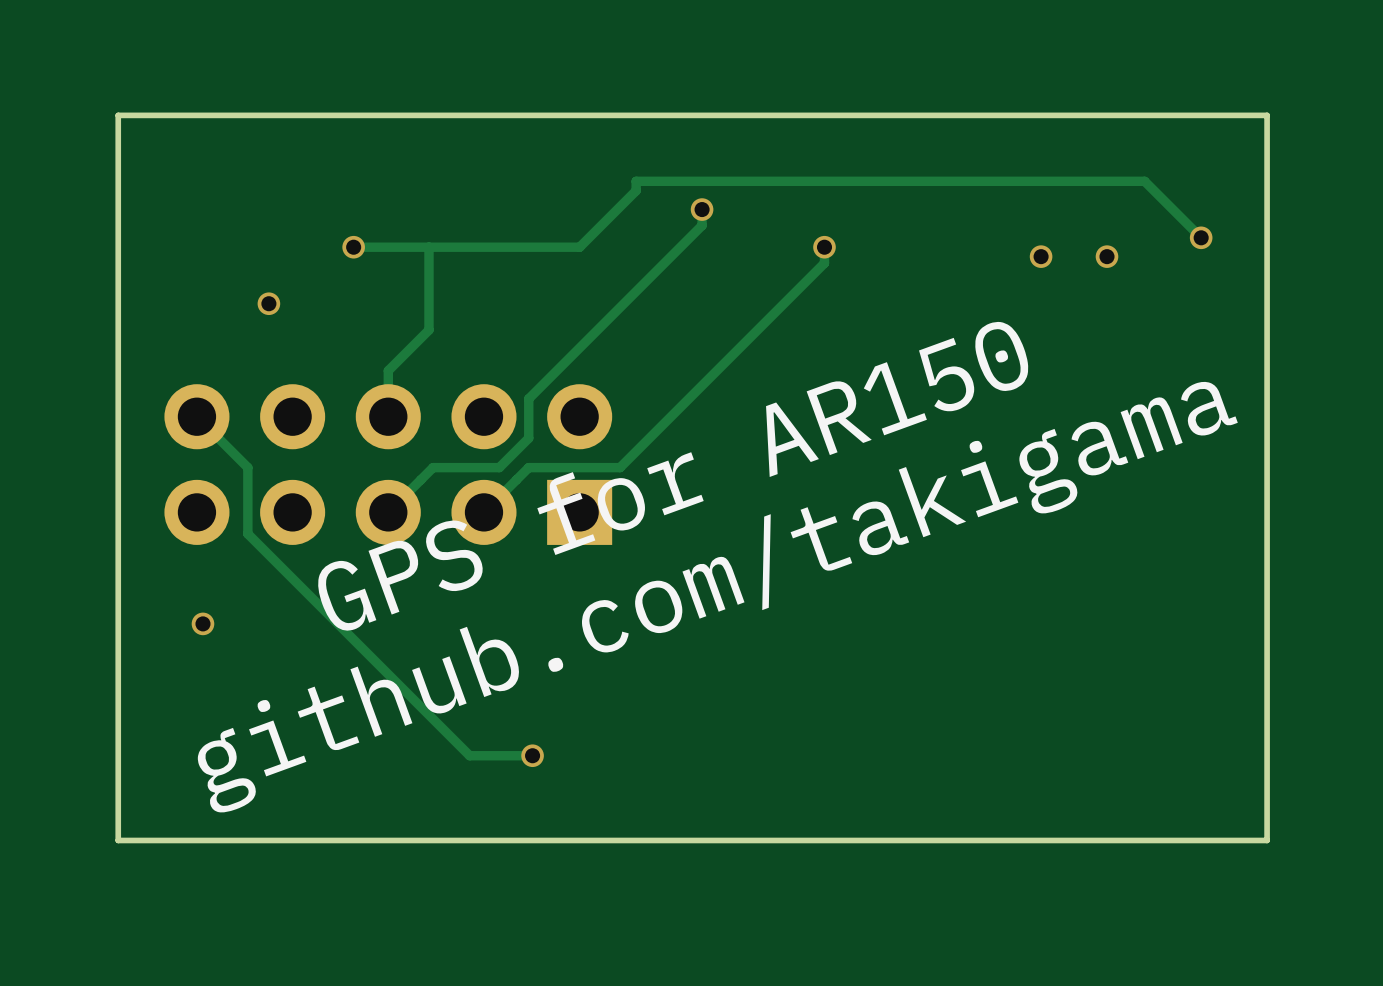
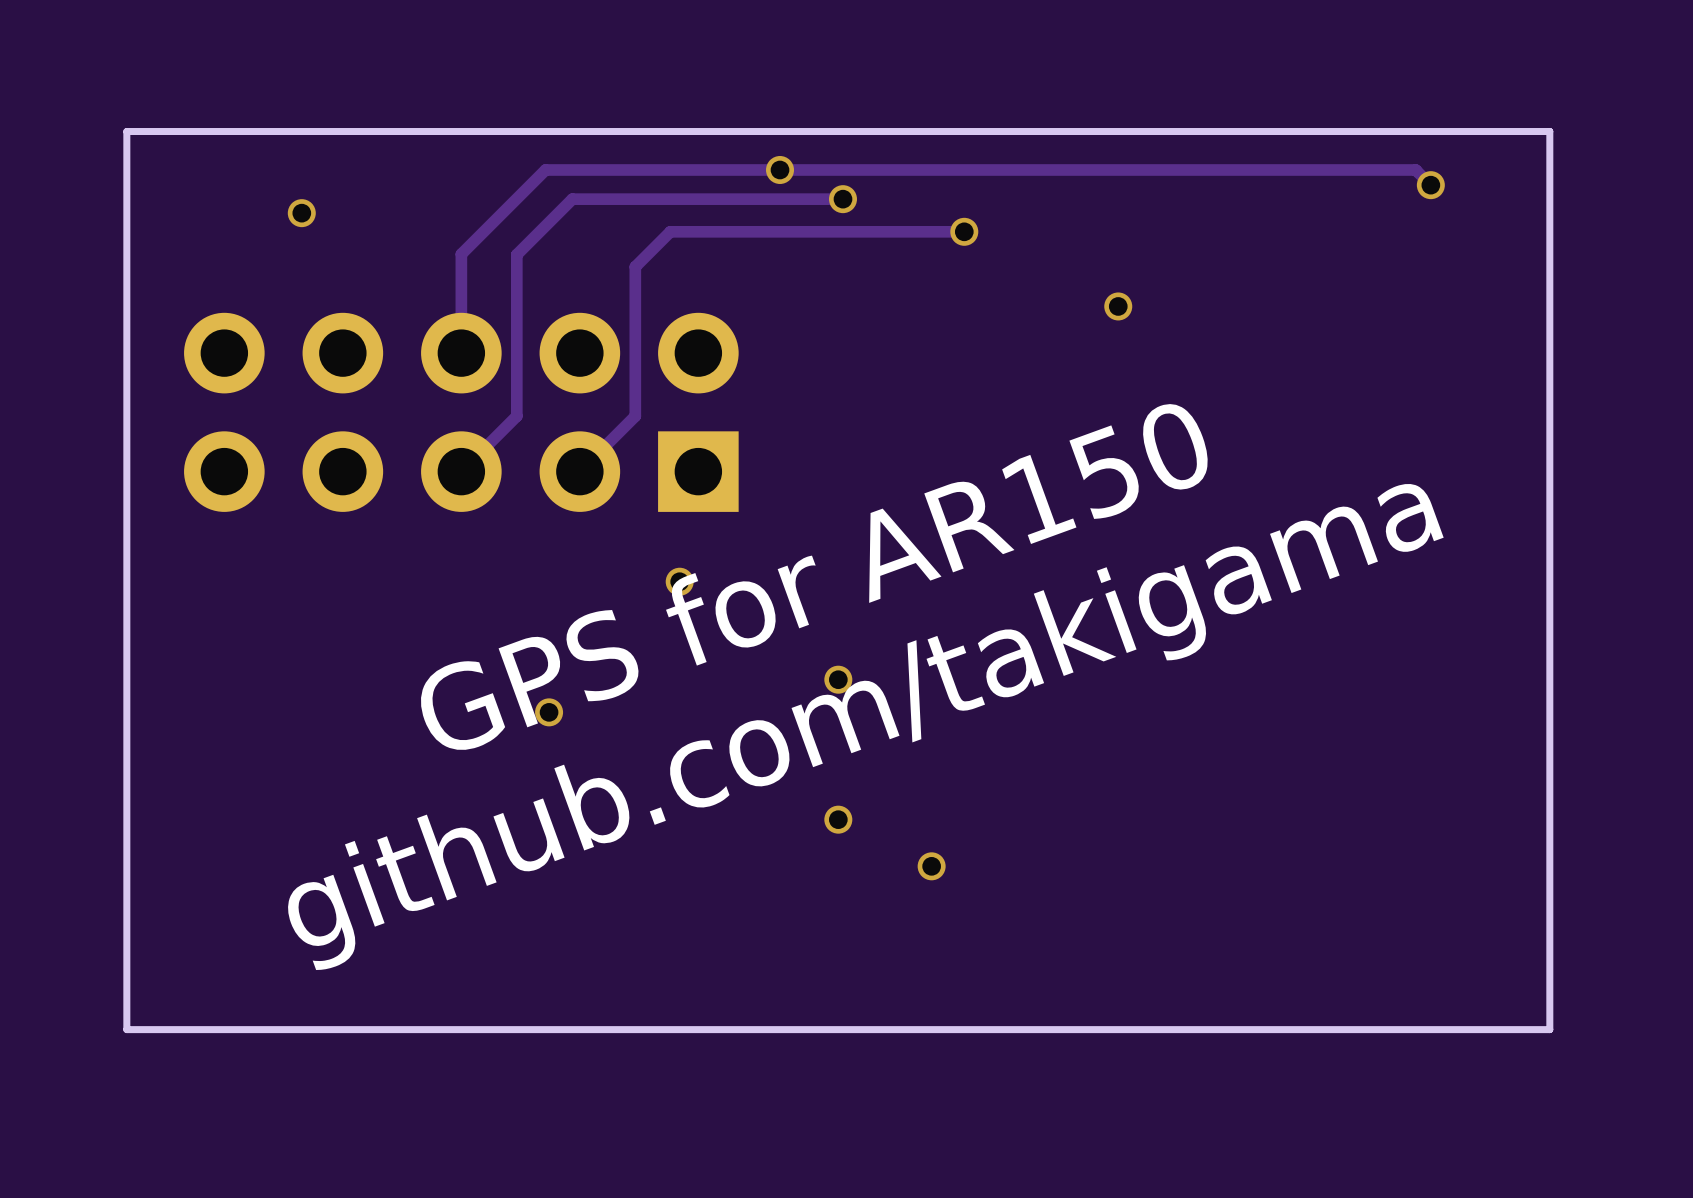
via: none -> (780, 169)
track: none -> (1430, 185) (1415, 169) (545, 169) (461, 254) (461, 353)
via: none -> (1430, 185)
track: none -> (842, 199) (572, 199) (516, 254) (516, 416) (461, 471)
via: none -> (301, 213)
track: none -> (964, 231) (670, 231) (635, 266) (635, 416) (579, 471)
via: none -> (964, 231)
track: (702, 209) (702, 225) (528, 398) (528, 438) (499, 467) (433, 467) (388, 512) -> none
via position: (702, 209) -> (842, 199)
track: (1201, 237) (1144, 181) (636, 181) (636, 190) (579, 247) (353, 247) -> none
via: (1201, 237) -> none
via: (353, 247) -> none
track: (428, 247) (428, 330) (388, 370) (388, 416) -> none
track: (824, 247) (824, 263) (620, 467) (528, 467) (483, 512) -> none
via: (824, 247) -> none
via: none -> (1118, 306)
via: (1041, 256) -> none
via: (1107, 256) -> none
via: (268, 303) -> none
track: (196, 416) (247, 467) (247, 533) (469, 755) (532, 755) -> none
part position: (388, 464) -> (461, 412)
via: none -> (679, 581)
via: none -> (838, 679)
via: none -> (549, 712)
via: (202, 623) -> none
via: none -> (838, 819)
via: none -> (931, 866)
via: (532, 755) -> none

